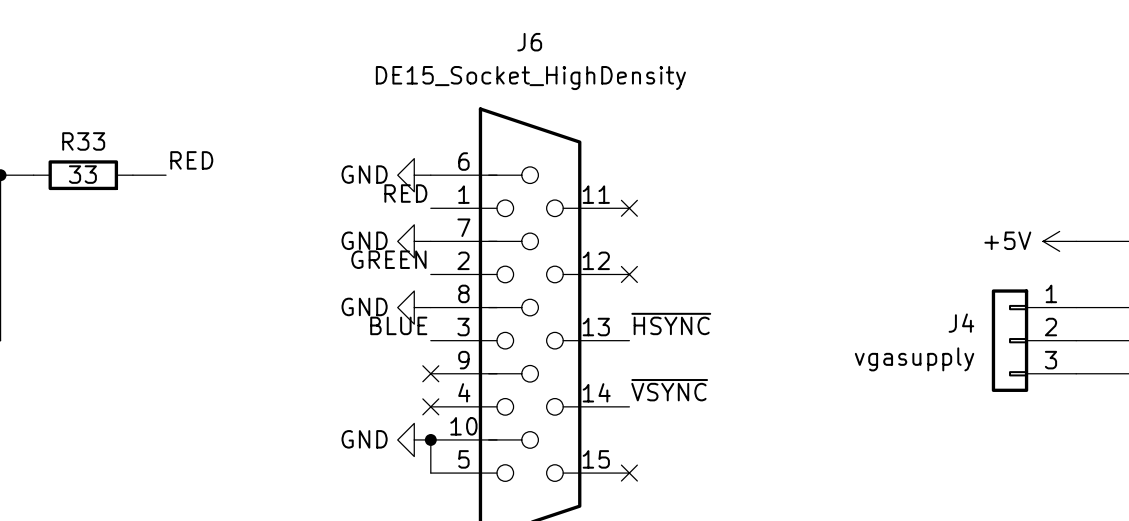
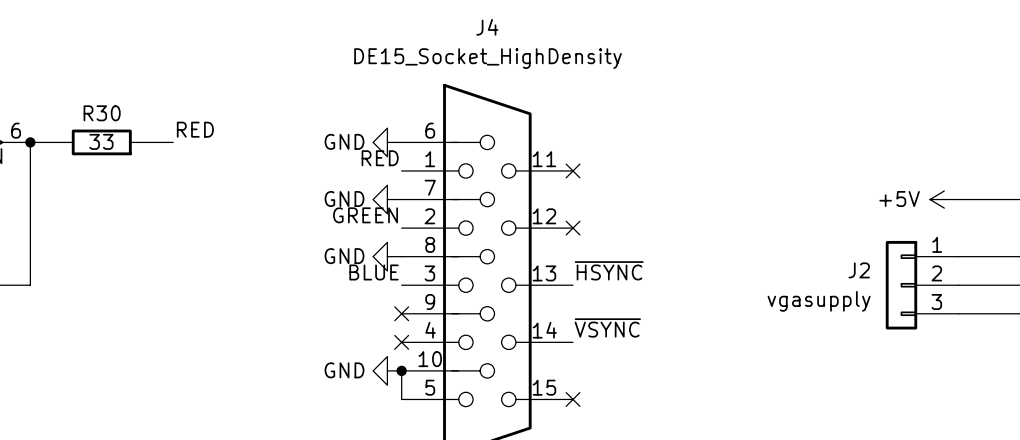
J6 name: J6 (529, 42) -> J4 (487, 27)
R33 name: R33 (83, 141) -> R30 (102, 113)
J4 name: J4 (961, 323) -> J2 (859, 270)

